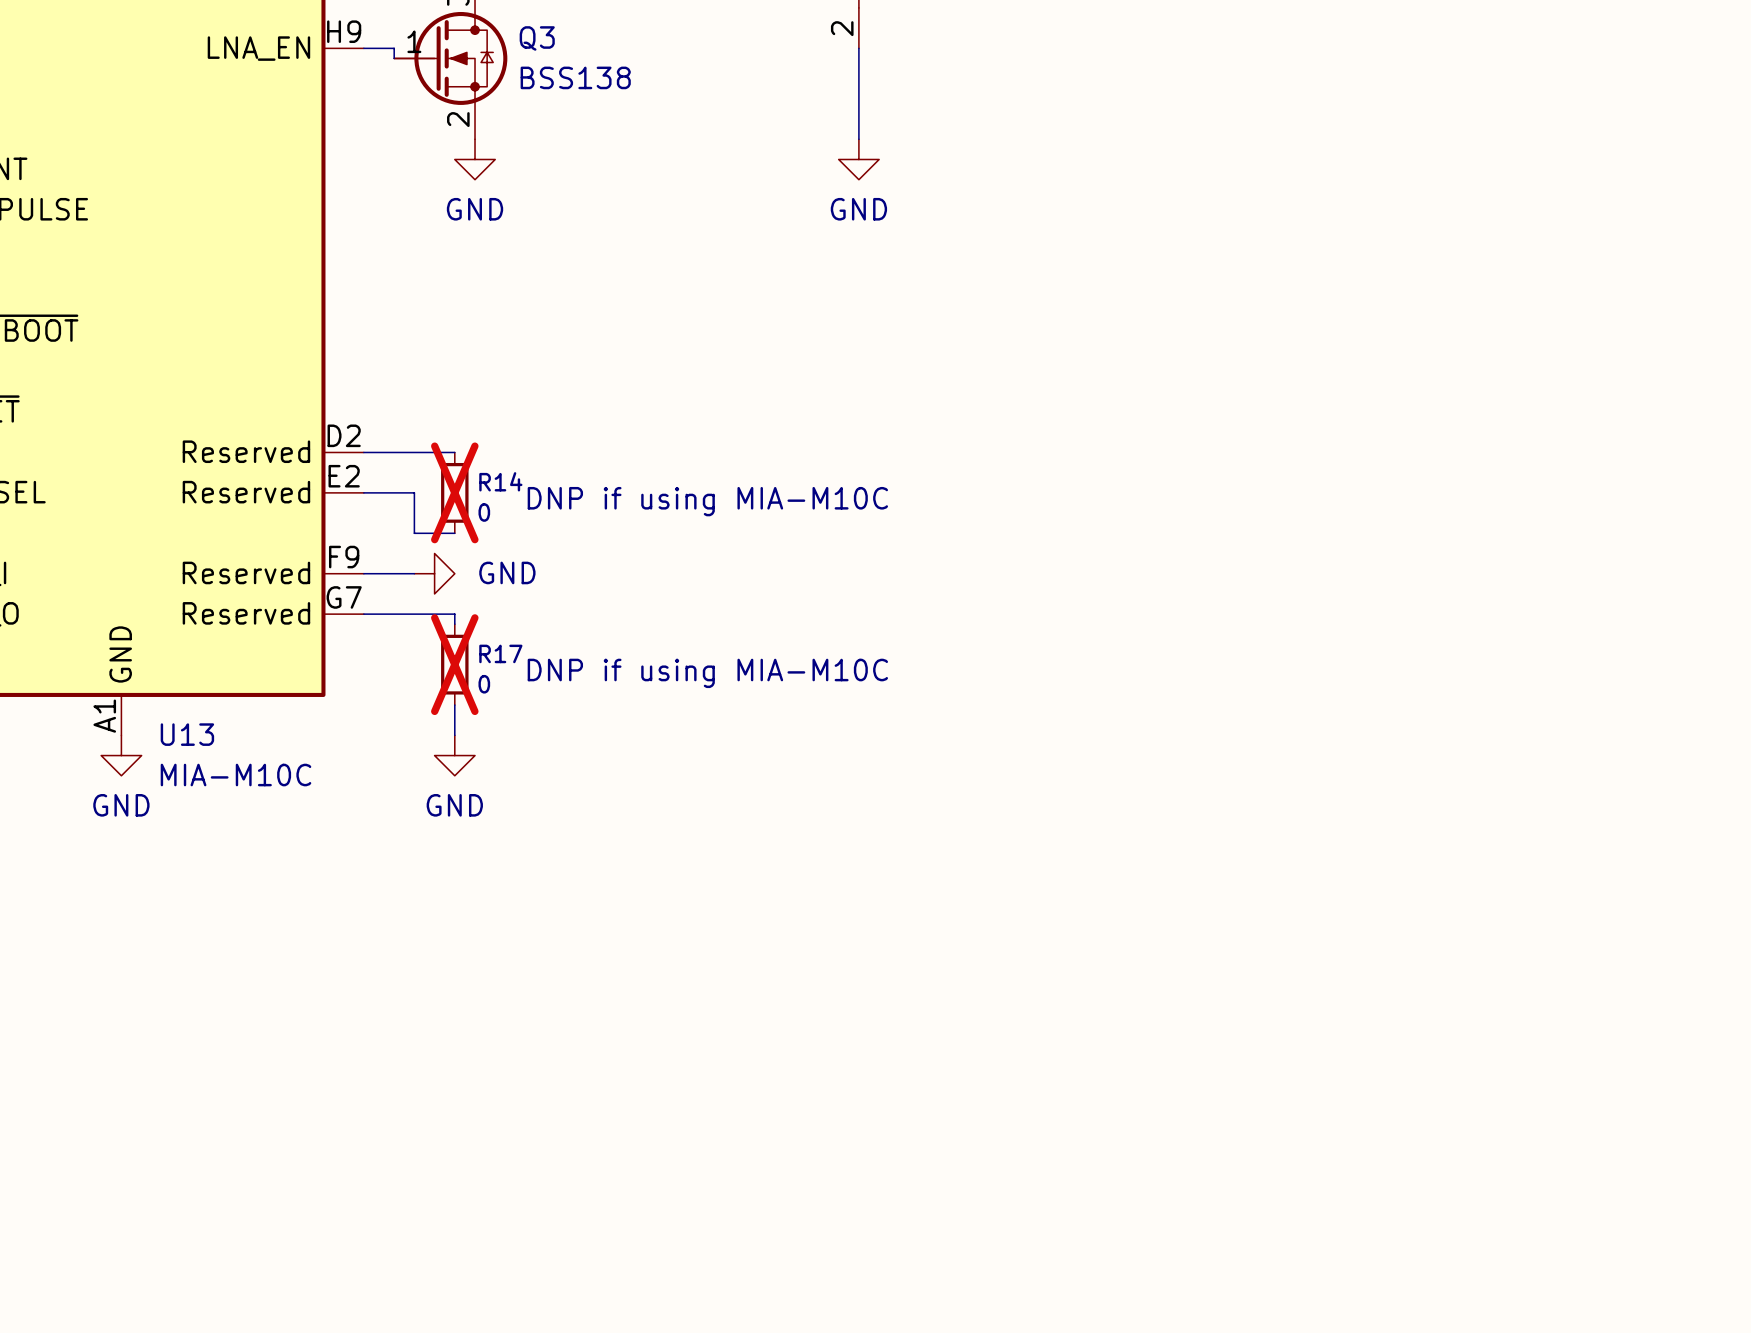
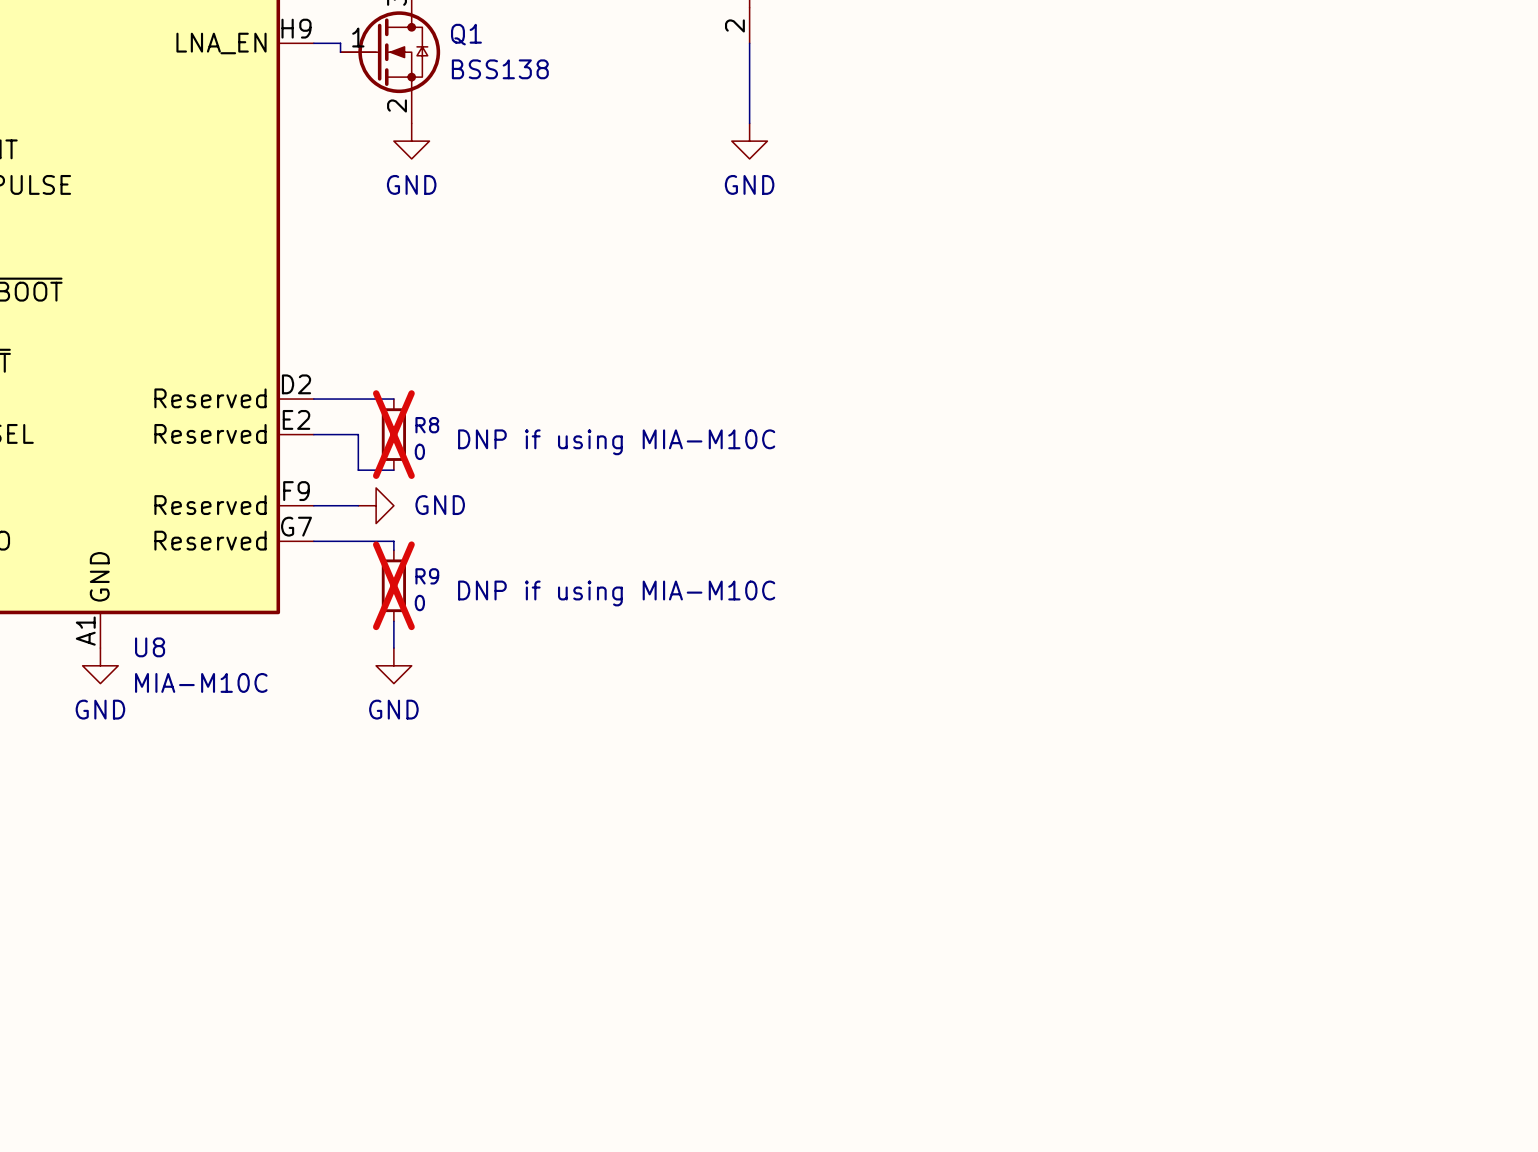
Q3 name: Q3 (537, 38) -> Q1 (466, 34)
R14 name: R14 (500, 481) -> R8 (427, 425)
R17 name: R17 (500, 653) -> R9 (427, 576)
U13 name: U13 (187, 734) -> U8 (150, 647)

